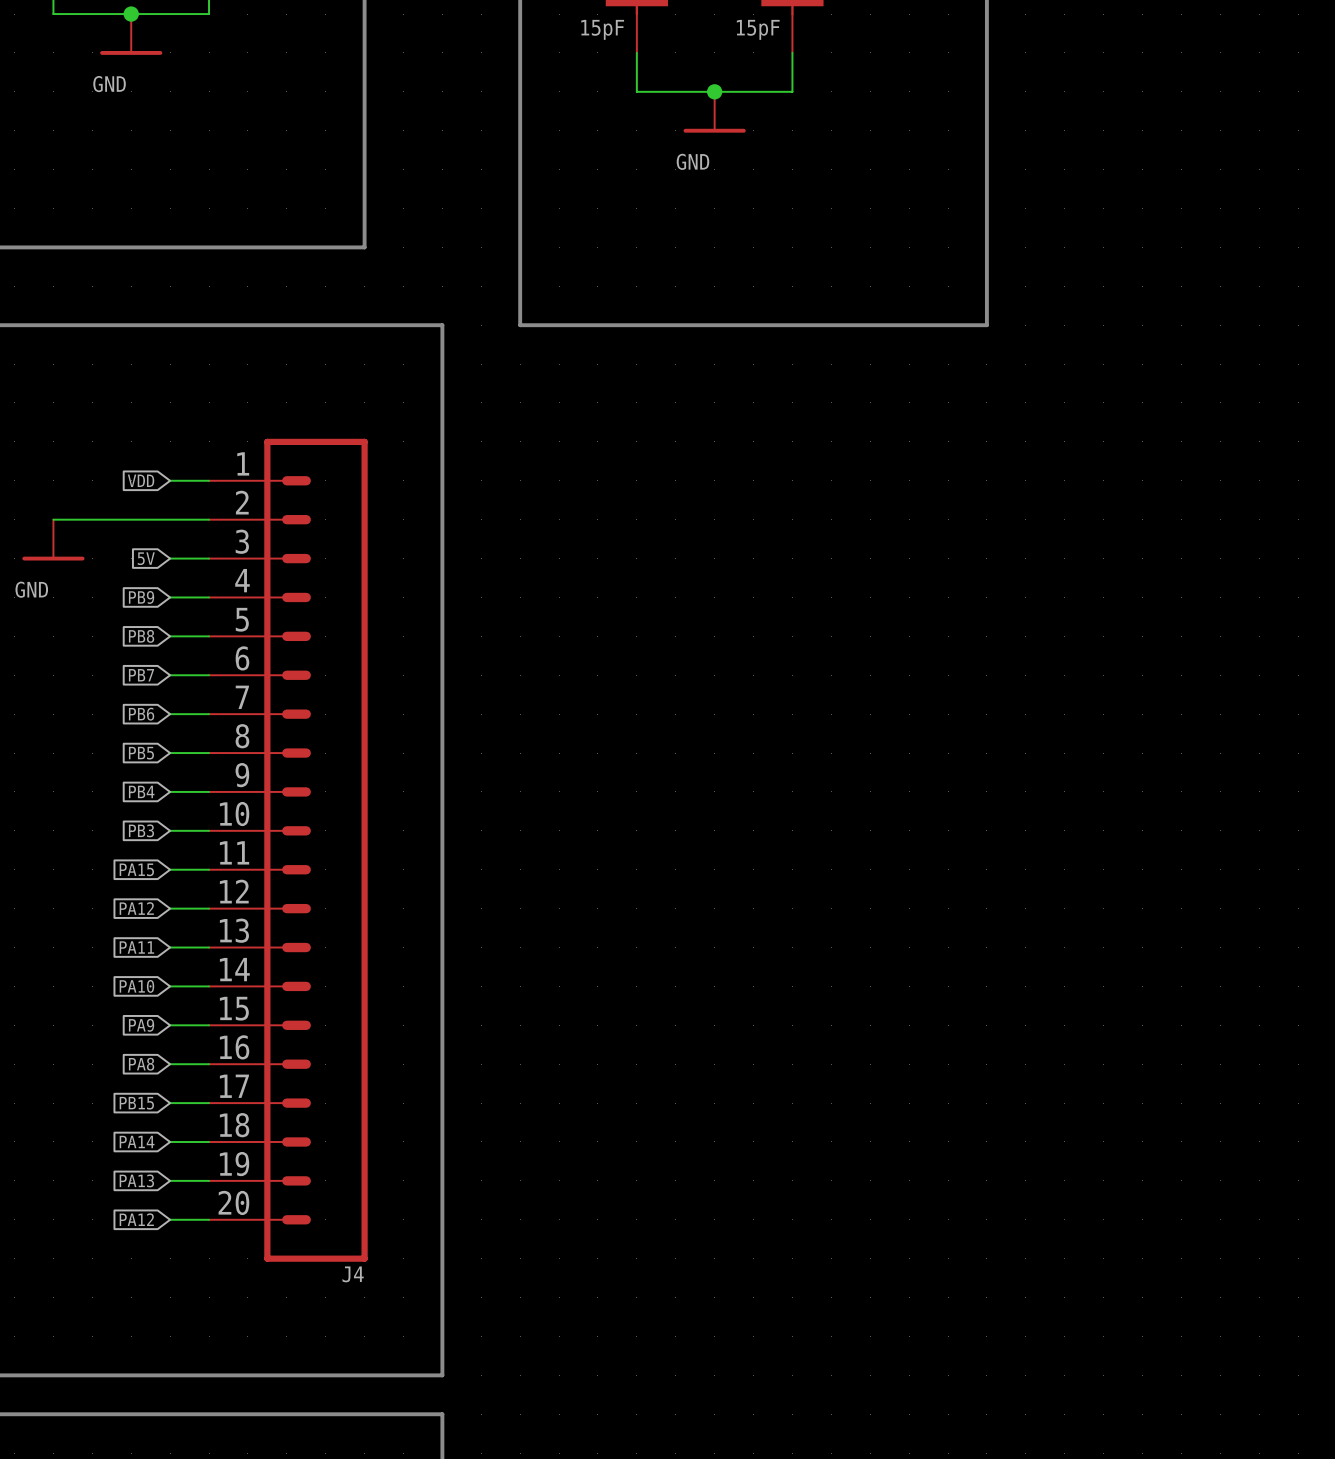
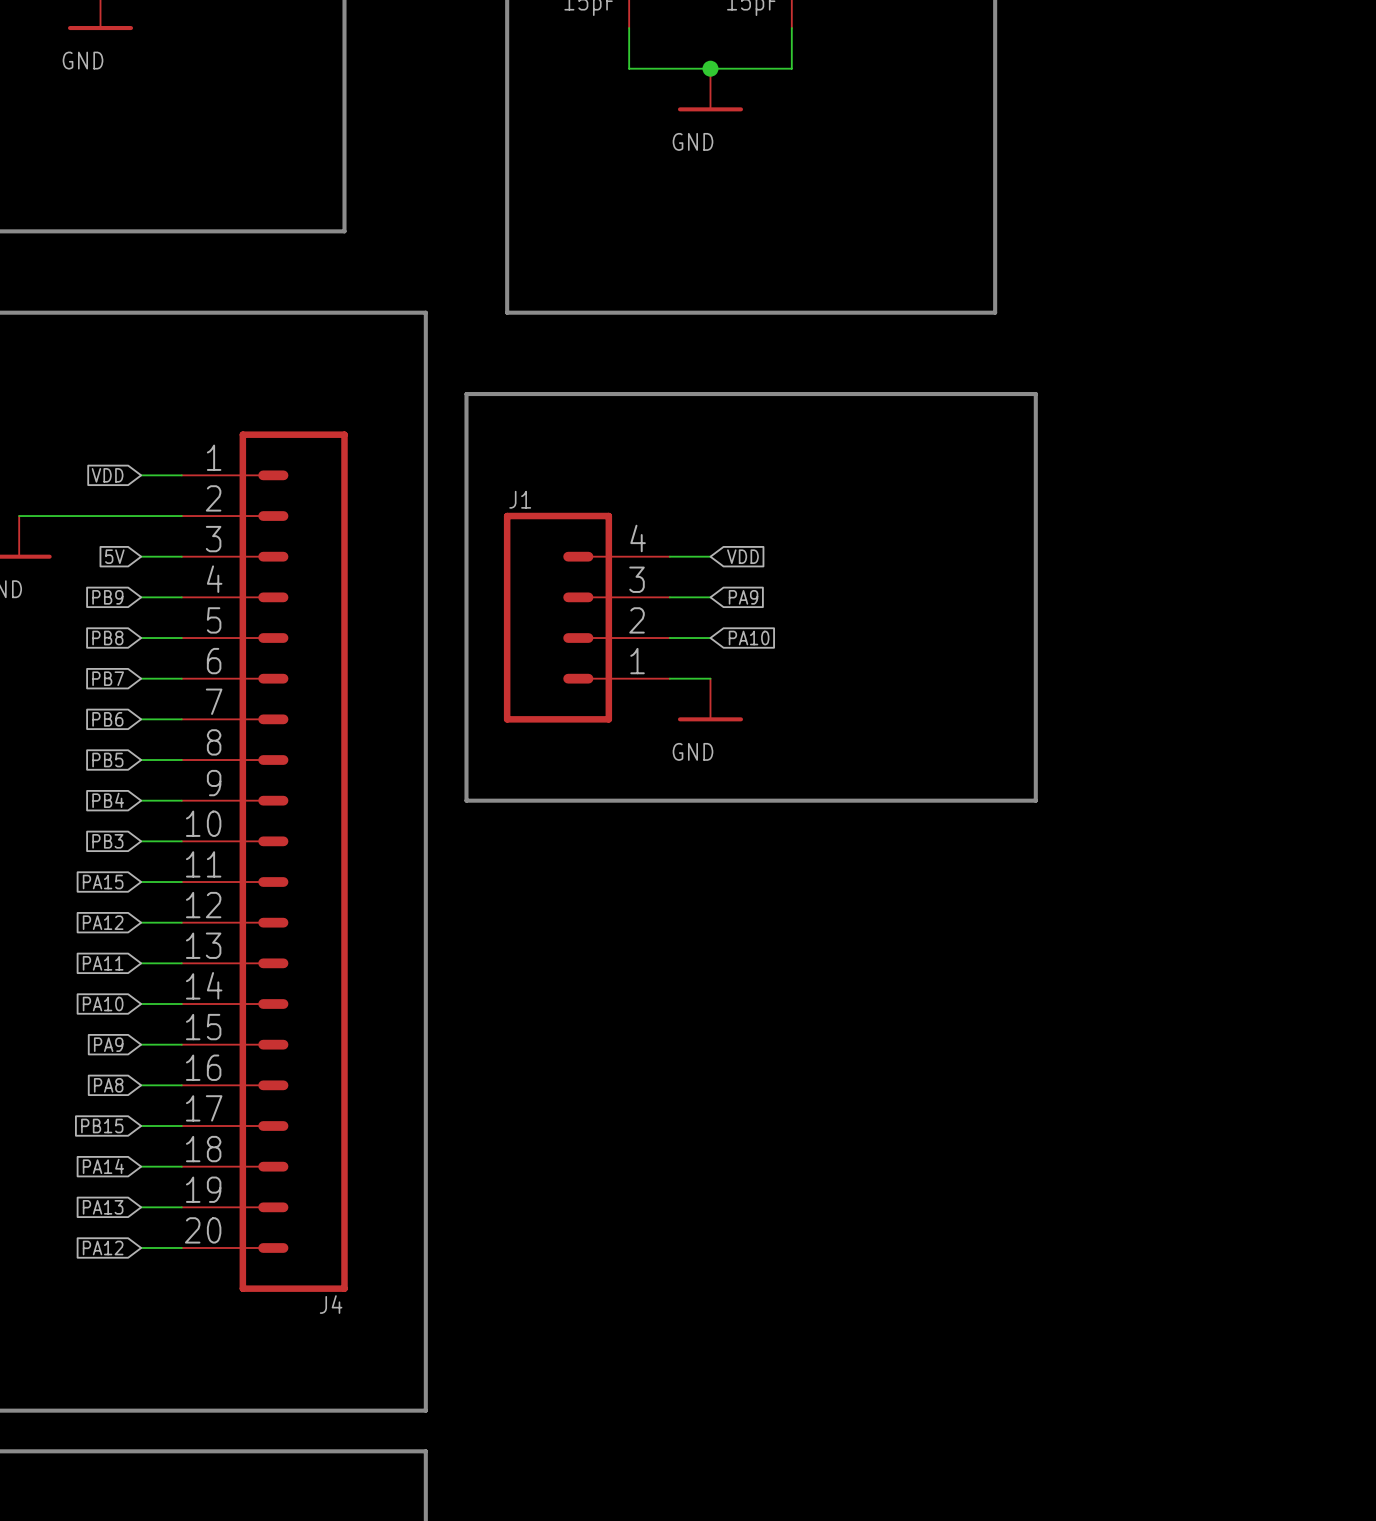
line: none -> (466, 394) (466, 800) (1035, 800) (1035, 394) (466, 394)
wire: none -> (669, 556) (710, 556)
global label: none -> VDD (742, 556)
wire: none -> (669, 597) (710, 597)
global label: none -> PA9 (743, 597)
J1: none -> (586, 617)
wire: none -> (669, 638) (710, 638)
global label: none -> PA10 (749, 638)
wire: none -> (669, 678) (710, 678)
power symbol: none -> GND (710, 700)

